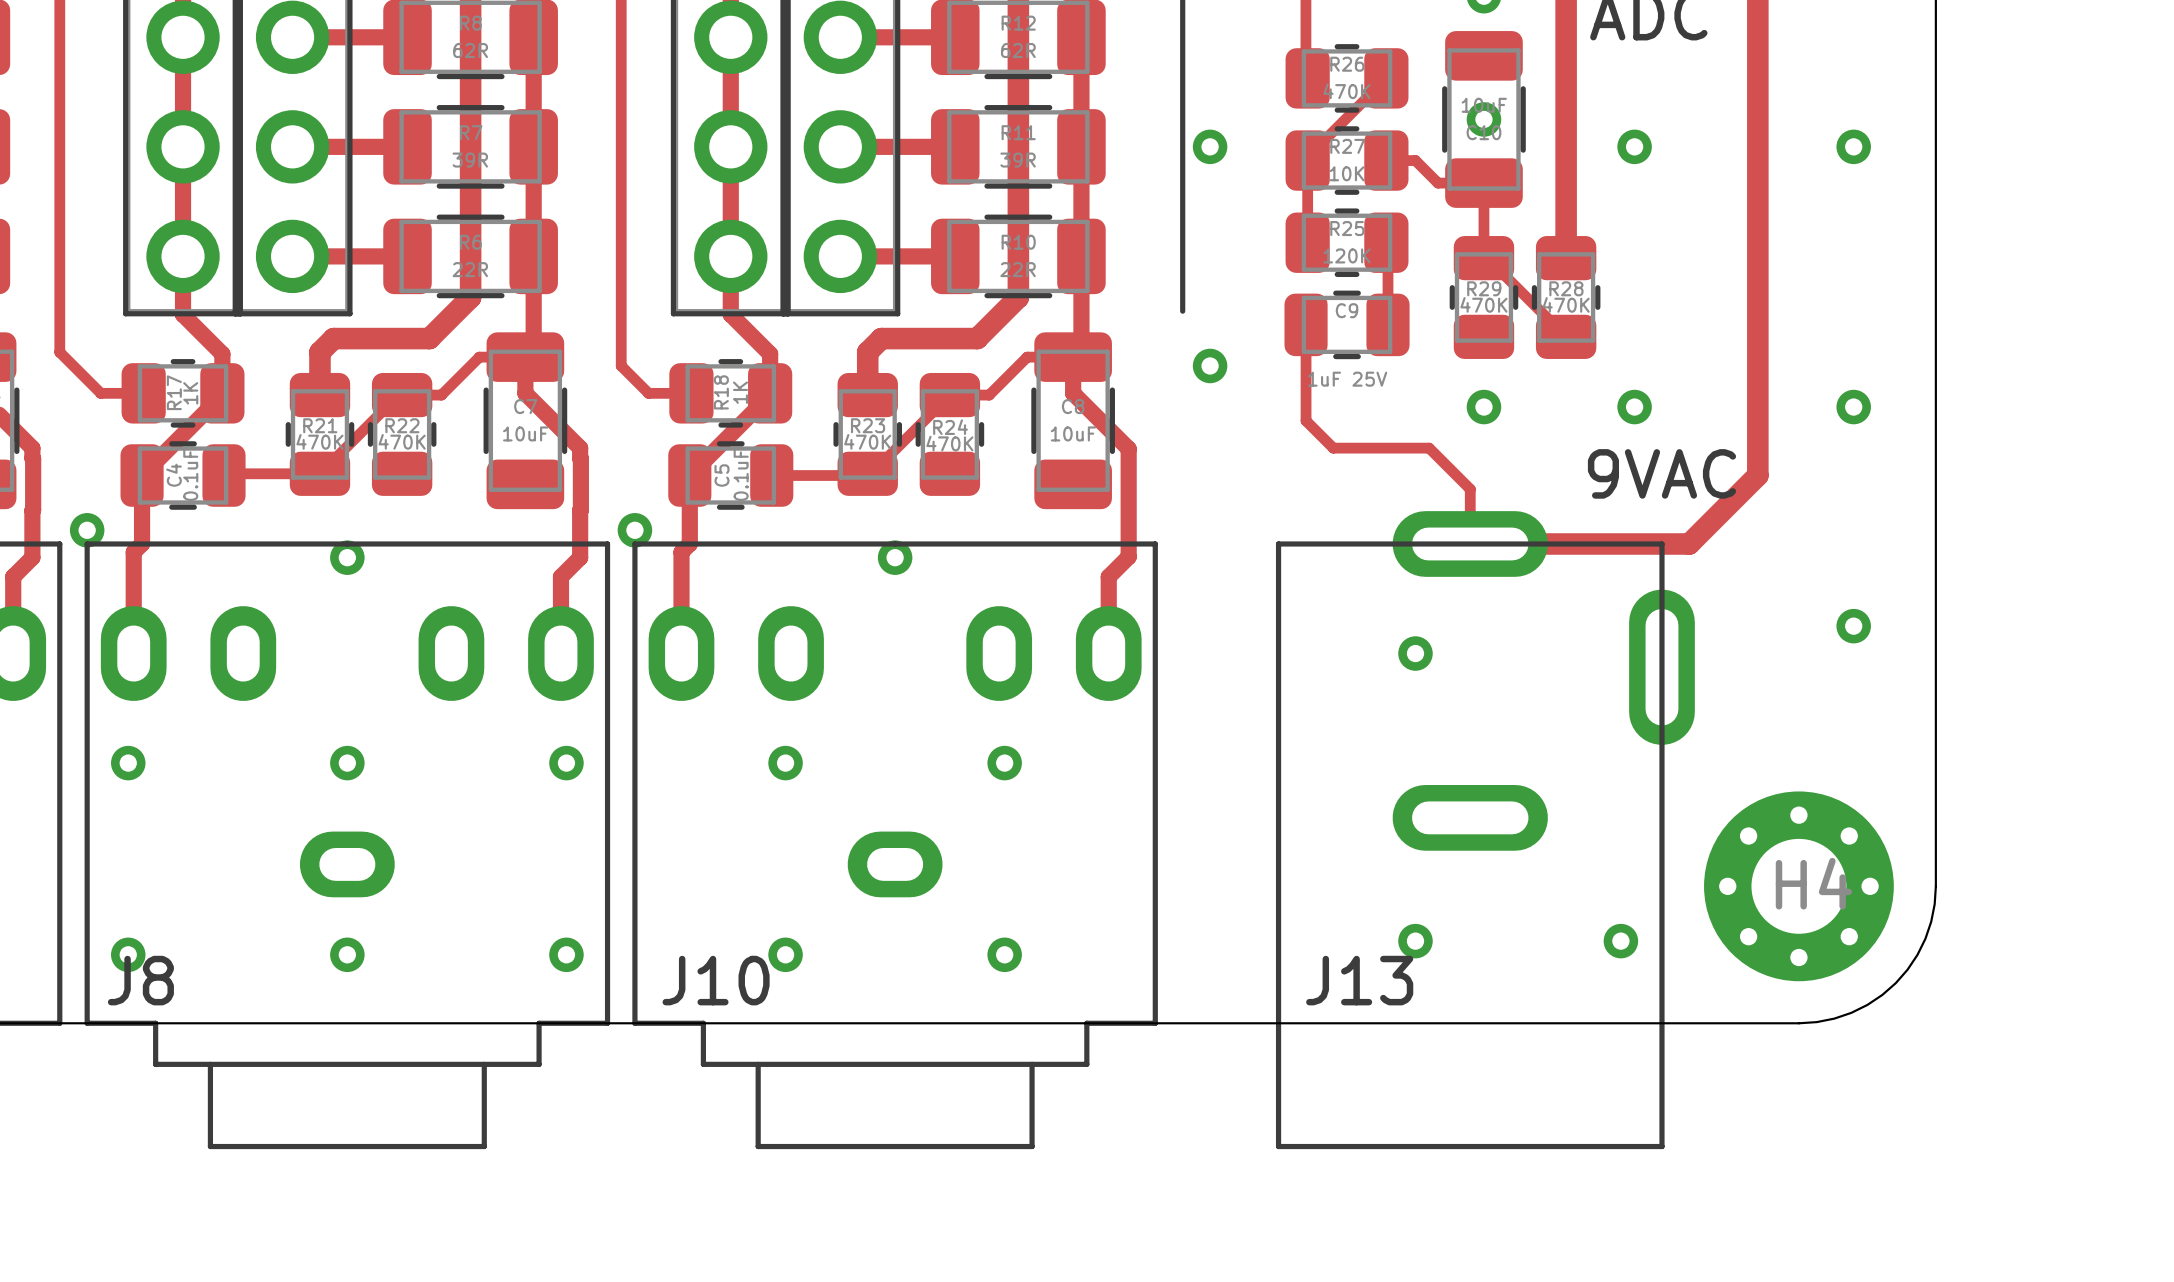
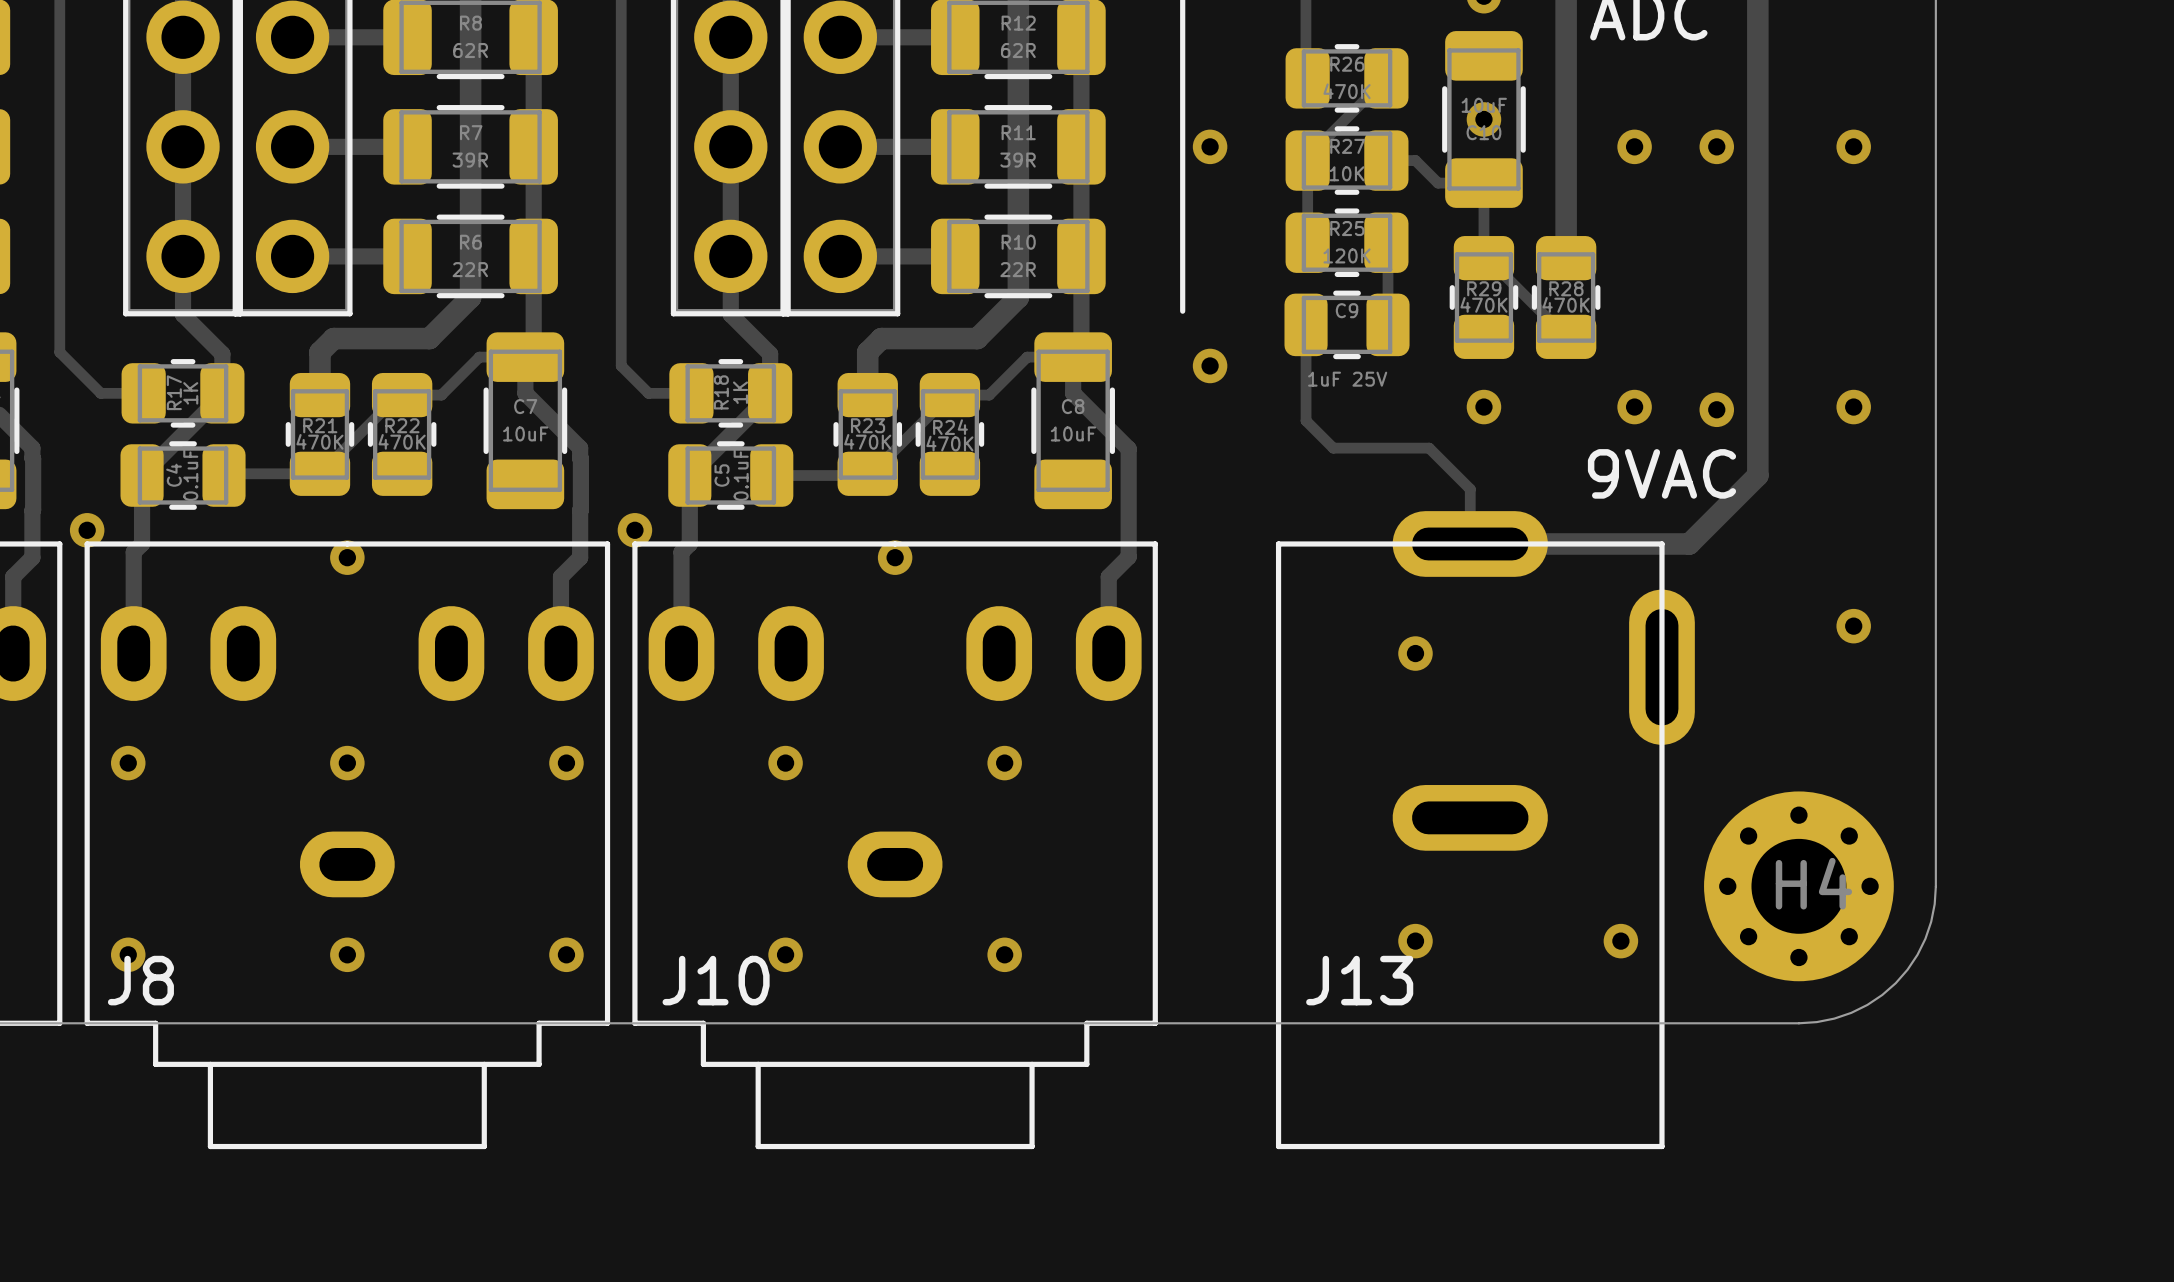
via: none -> (1716, 146)
via: none -> (1716, 409)

